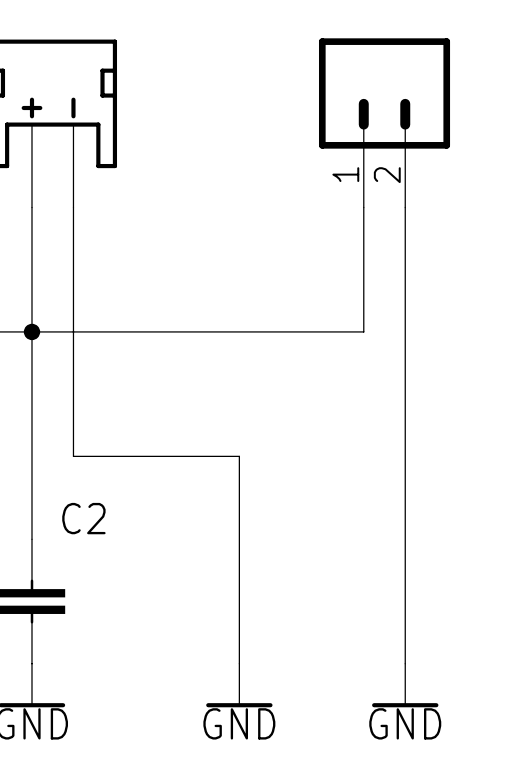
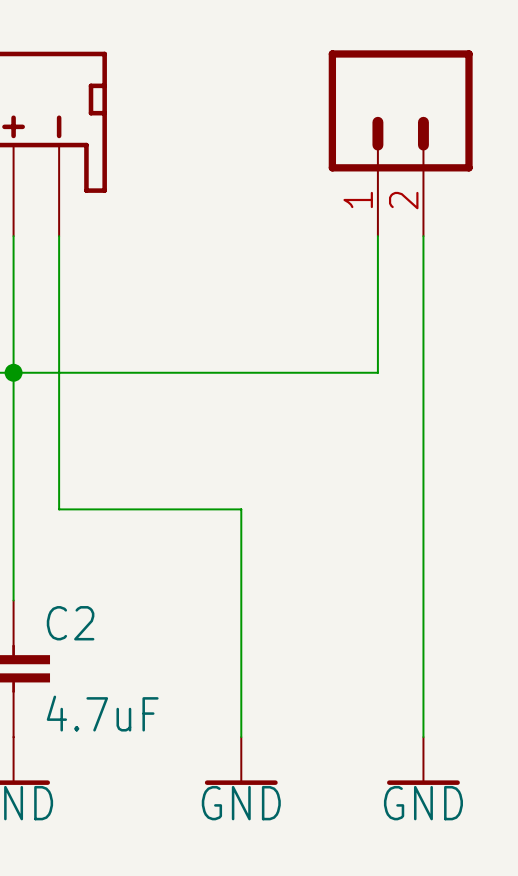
C2 name position: C2 (83, 518) -> C2 (70, 623)
C2 value: none -> 4.7uF (102, 713)

